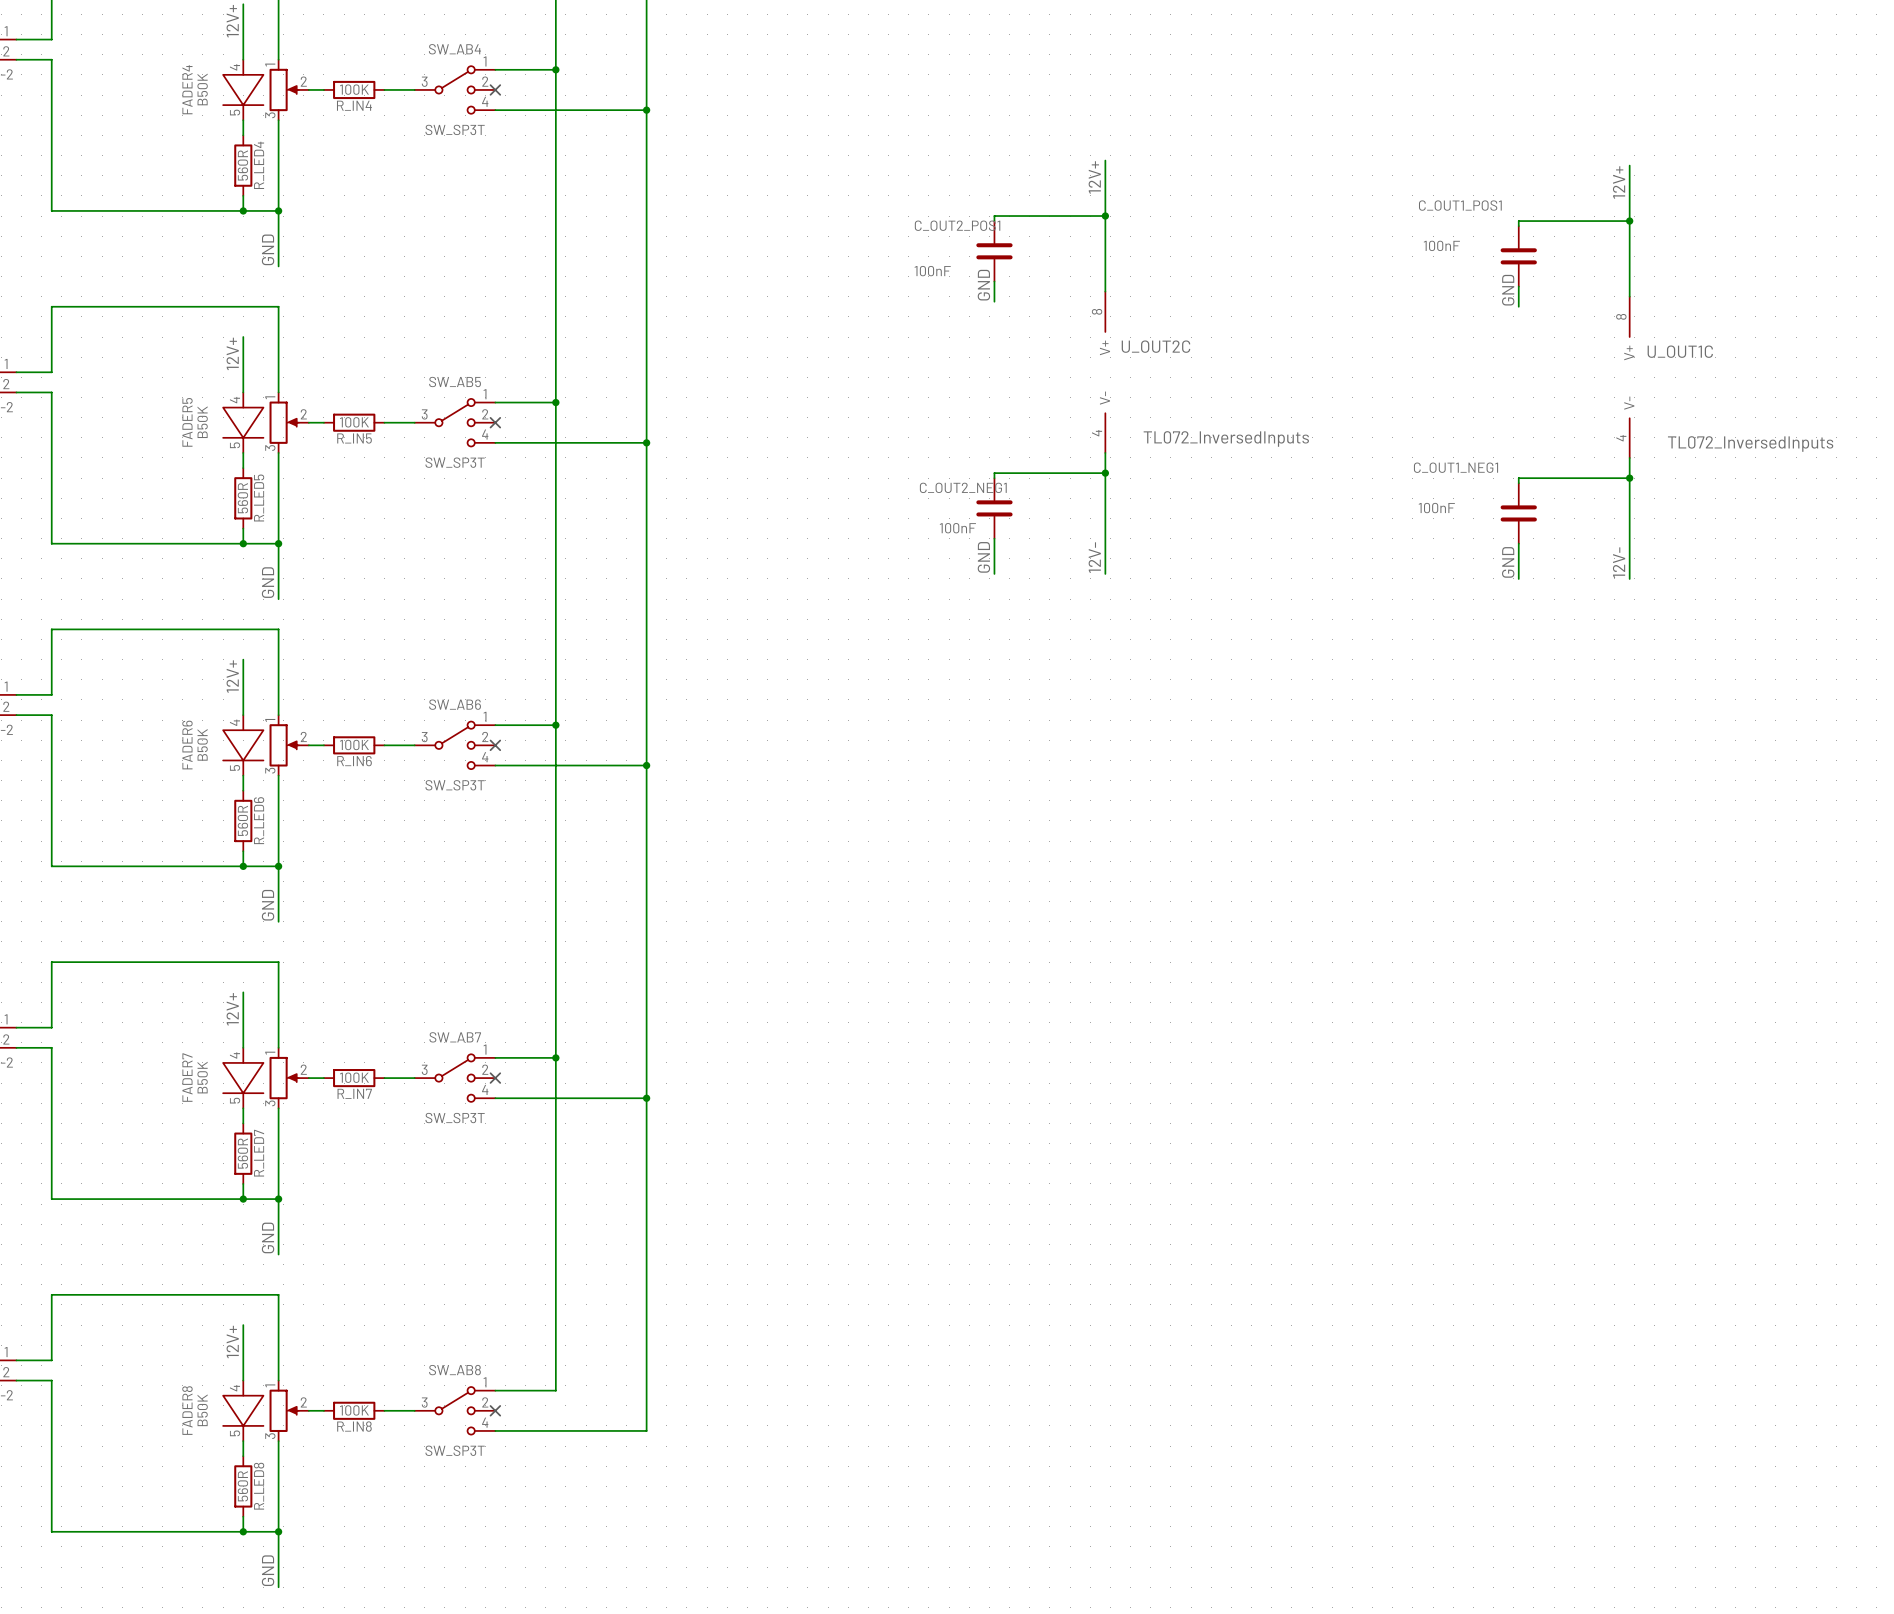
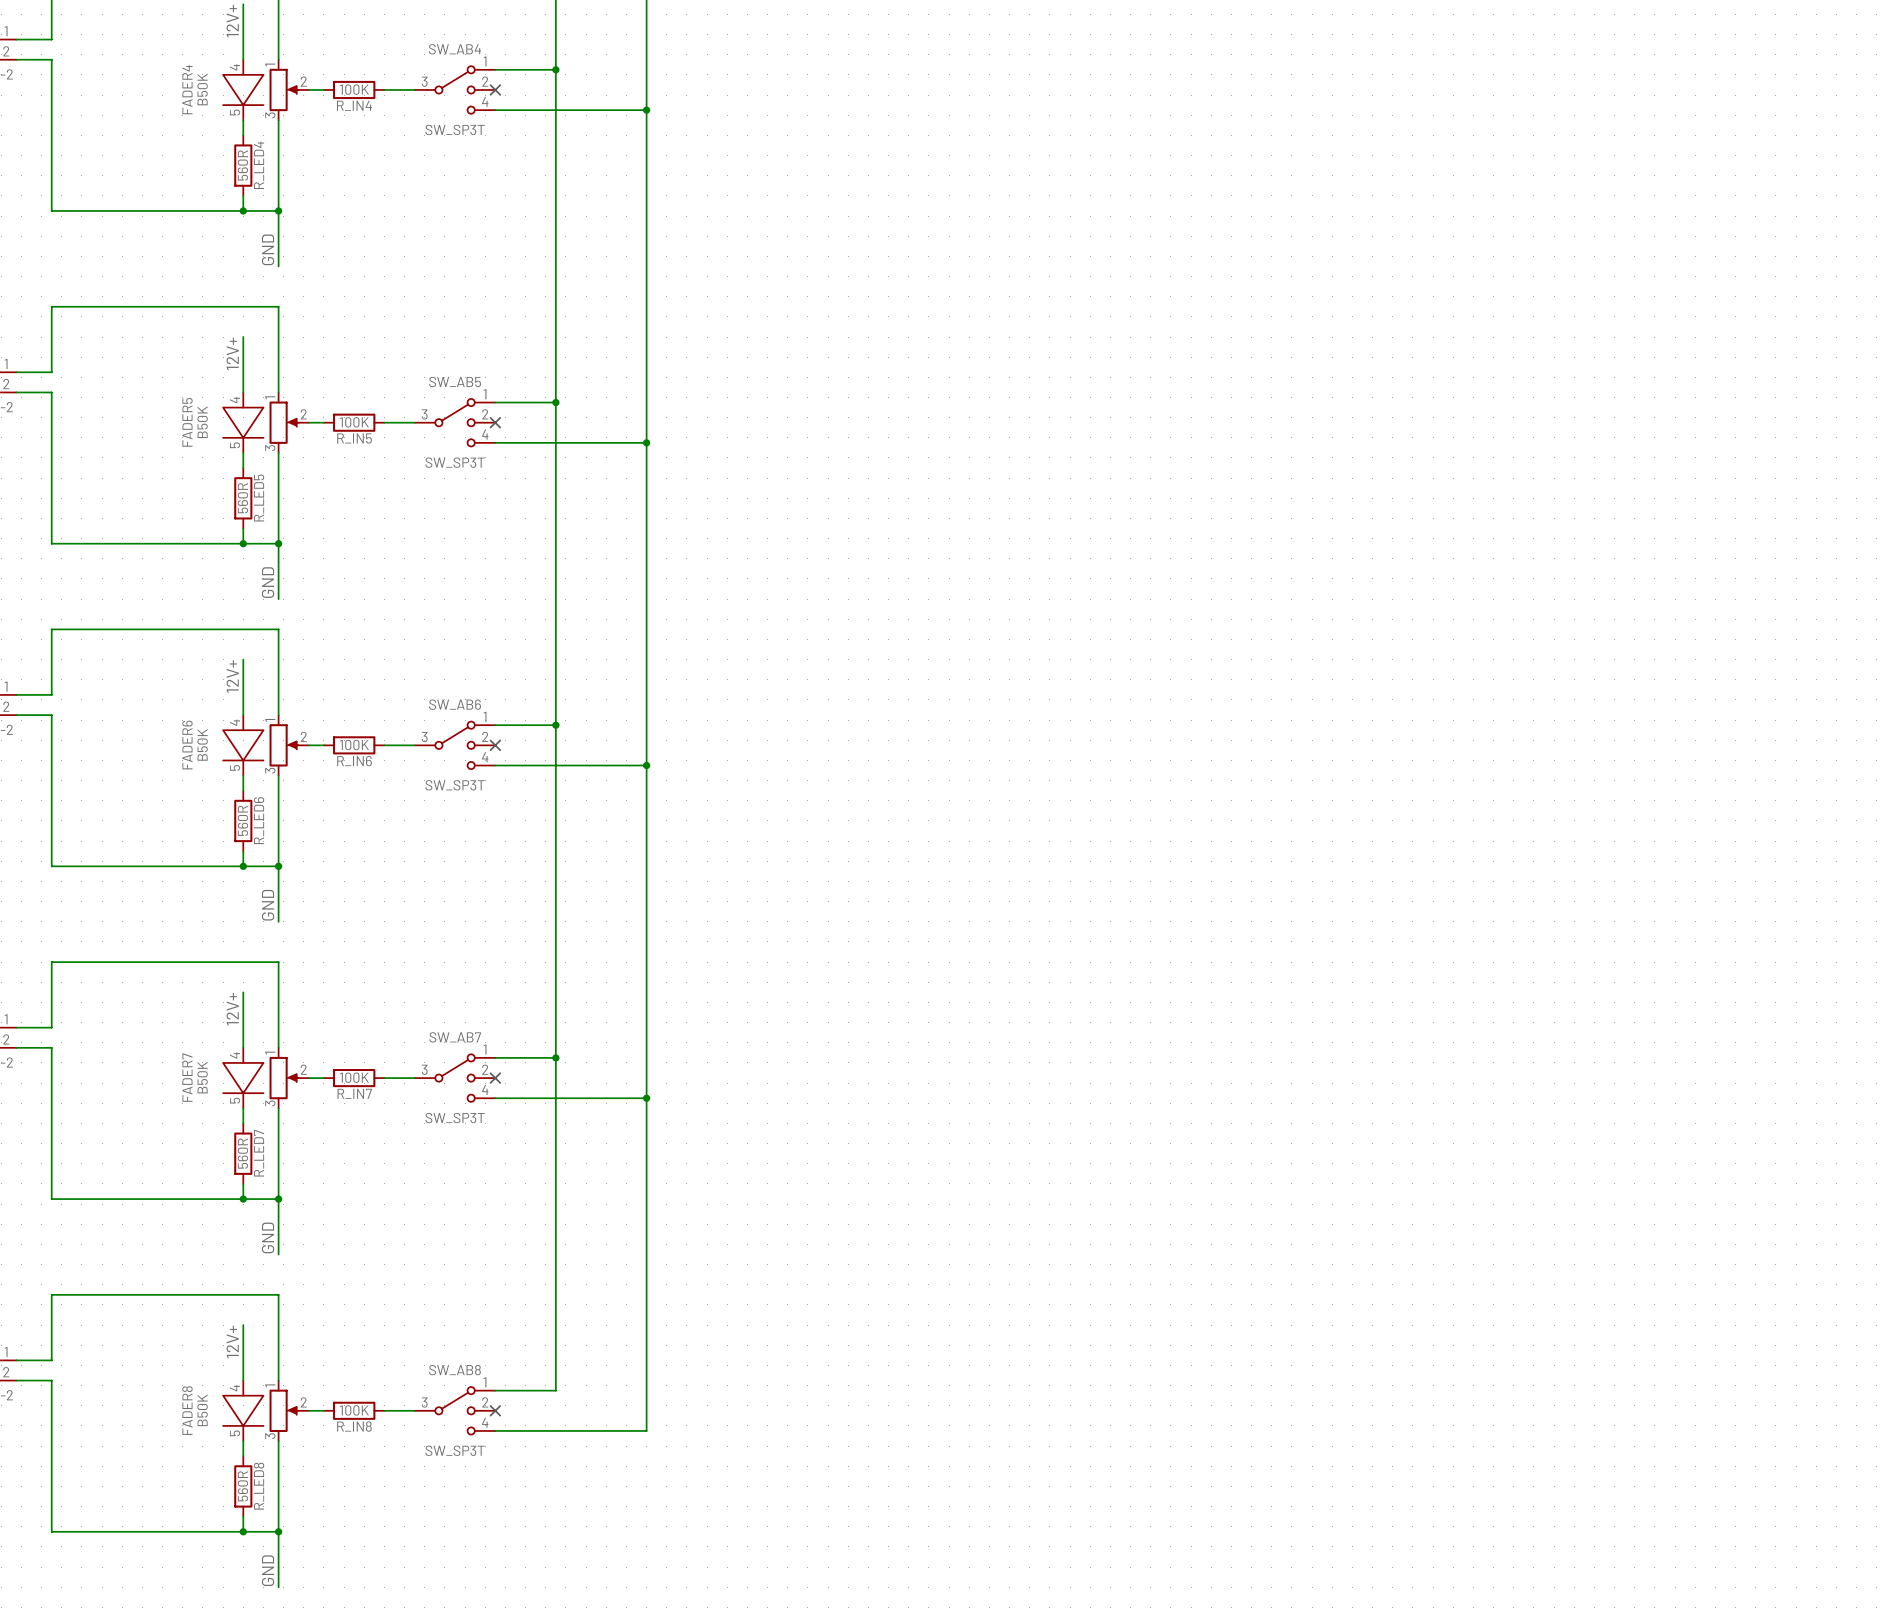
wire: (1105, 160) (1105, 291) -> none
wire: (1629, 165) (1629, 296) -> none
label: 12V+ (1094, 177) -> none
label: 12V+ (1619, 182) -> none
wire: (1105, 216) (994, 216) (994, 221) -> none
junction: (1105, 216) -> none
wire: (1629, 221) (1518, 221) (1518, 226) -> none
junction: (1629, 221) -> none
C_OUT2_POS1: 100nF (994, 251) -> none
C_OUT1_POS1: 100nF (1518, 256) -> none
wire: (994, 281) (994, 301) -> none
label: GND (983, 285) -> none
wire: (1518, 286) (1518, 306) -> none
label: GND (1508, 290) -> none
U_OUT2C: TL072_InversedInputs (1105, 372) -> none
U_OUT1C: TL072_InversedInputs (1629, 377) -> none
wire: (1105, 452) (1105, 573) -> none
wire: (1629, 457) (1629, 578) -> none
wire: (1105, 473) (994, 473) (994, 478) -> none
junction: (1105, 473) -> none
wire: (1629, 478) (1518, 478) (1518, 483) -> none
junction: (1629, 478) -> none
C_OUT2_NEG1: 100nF (994, 508) -> none
C_OUT1_NEG1: 100nF (1518, 513) -> none
wire: (994, 538) (994, 573) -> none
wire: (1518, 543) (1518, 578) -> none
label: GND (983, 557) -> none
label: 12V- (1094, 557) -> none
label: GND (1508, 562) -> none
label: 12V- (1619, 562) -> none

